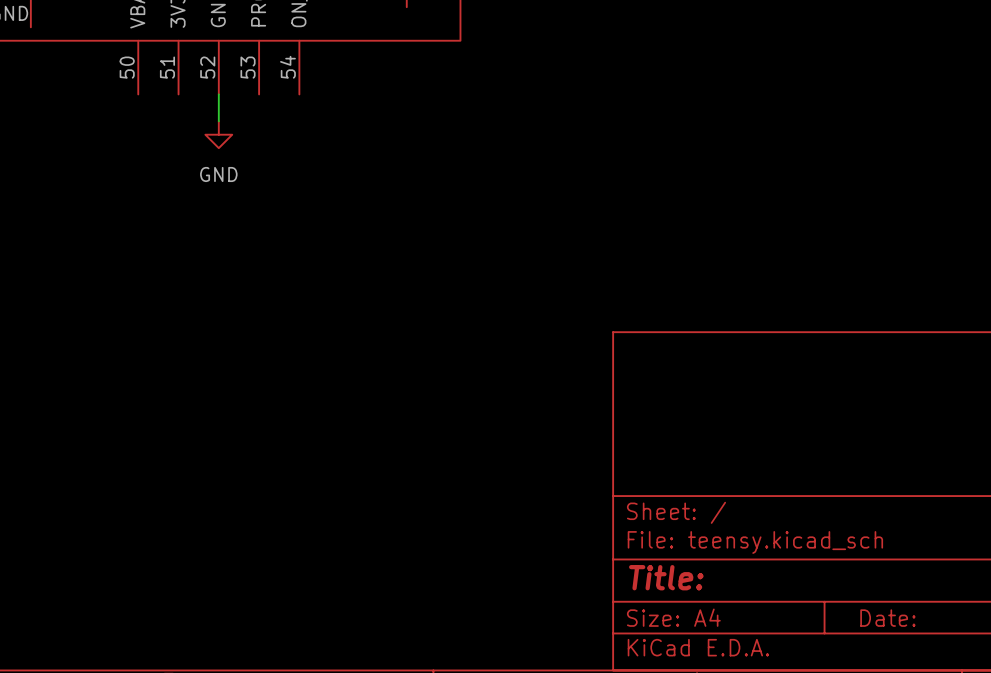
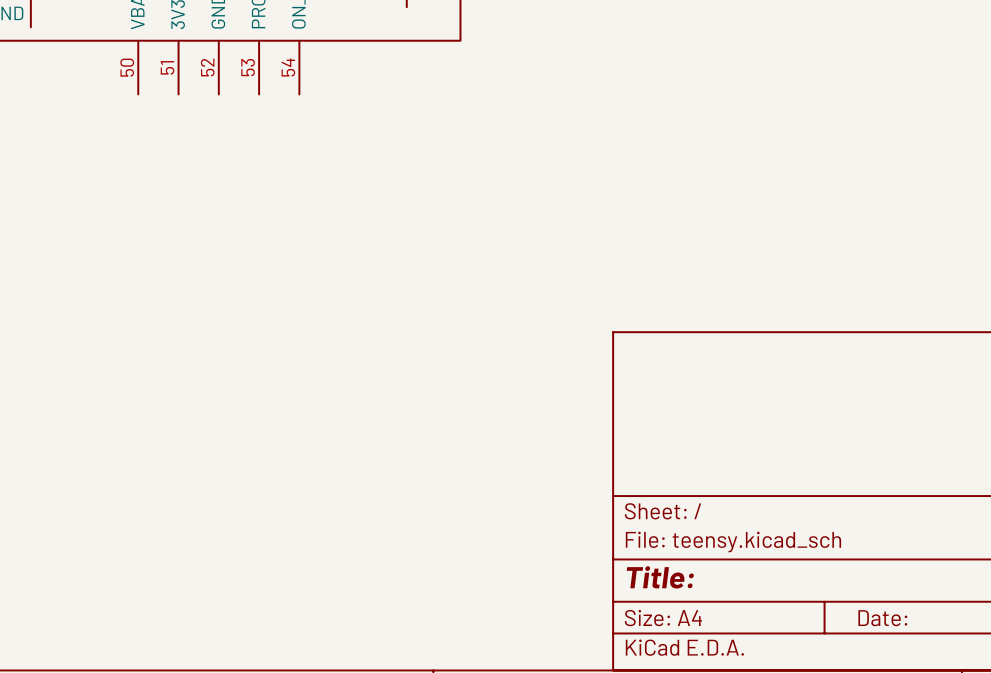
wire: (218, 94) (218, 121) -> none
power symbol: GND (218, 134) -> none

